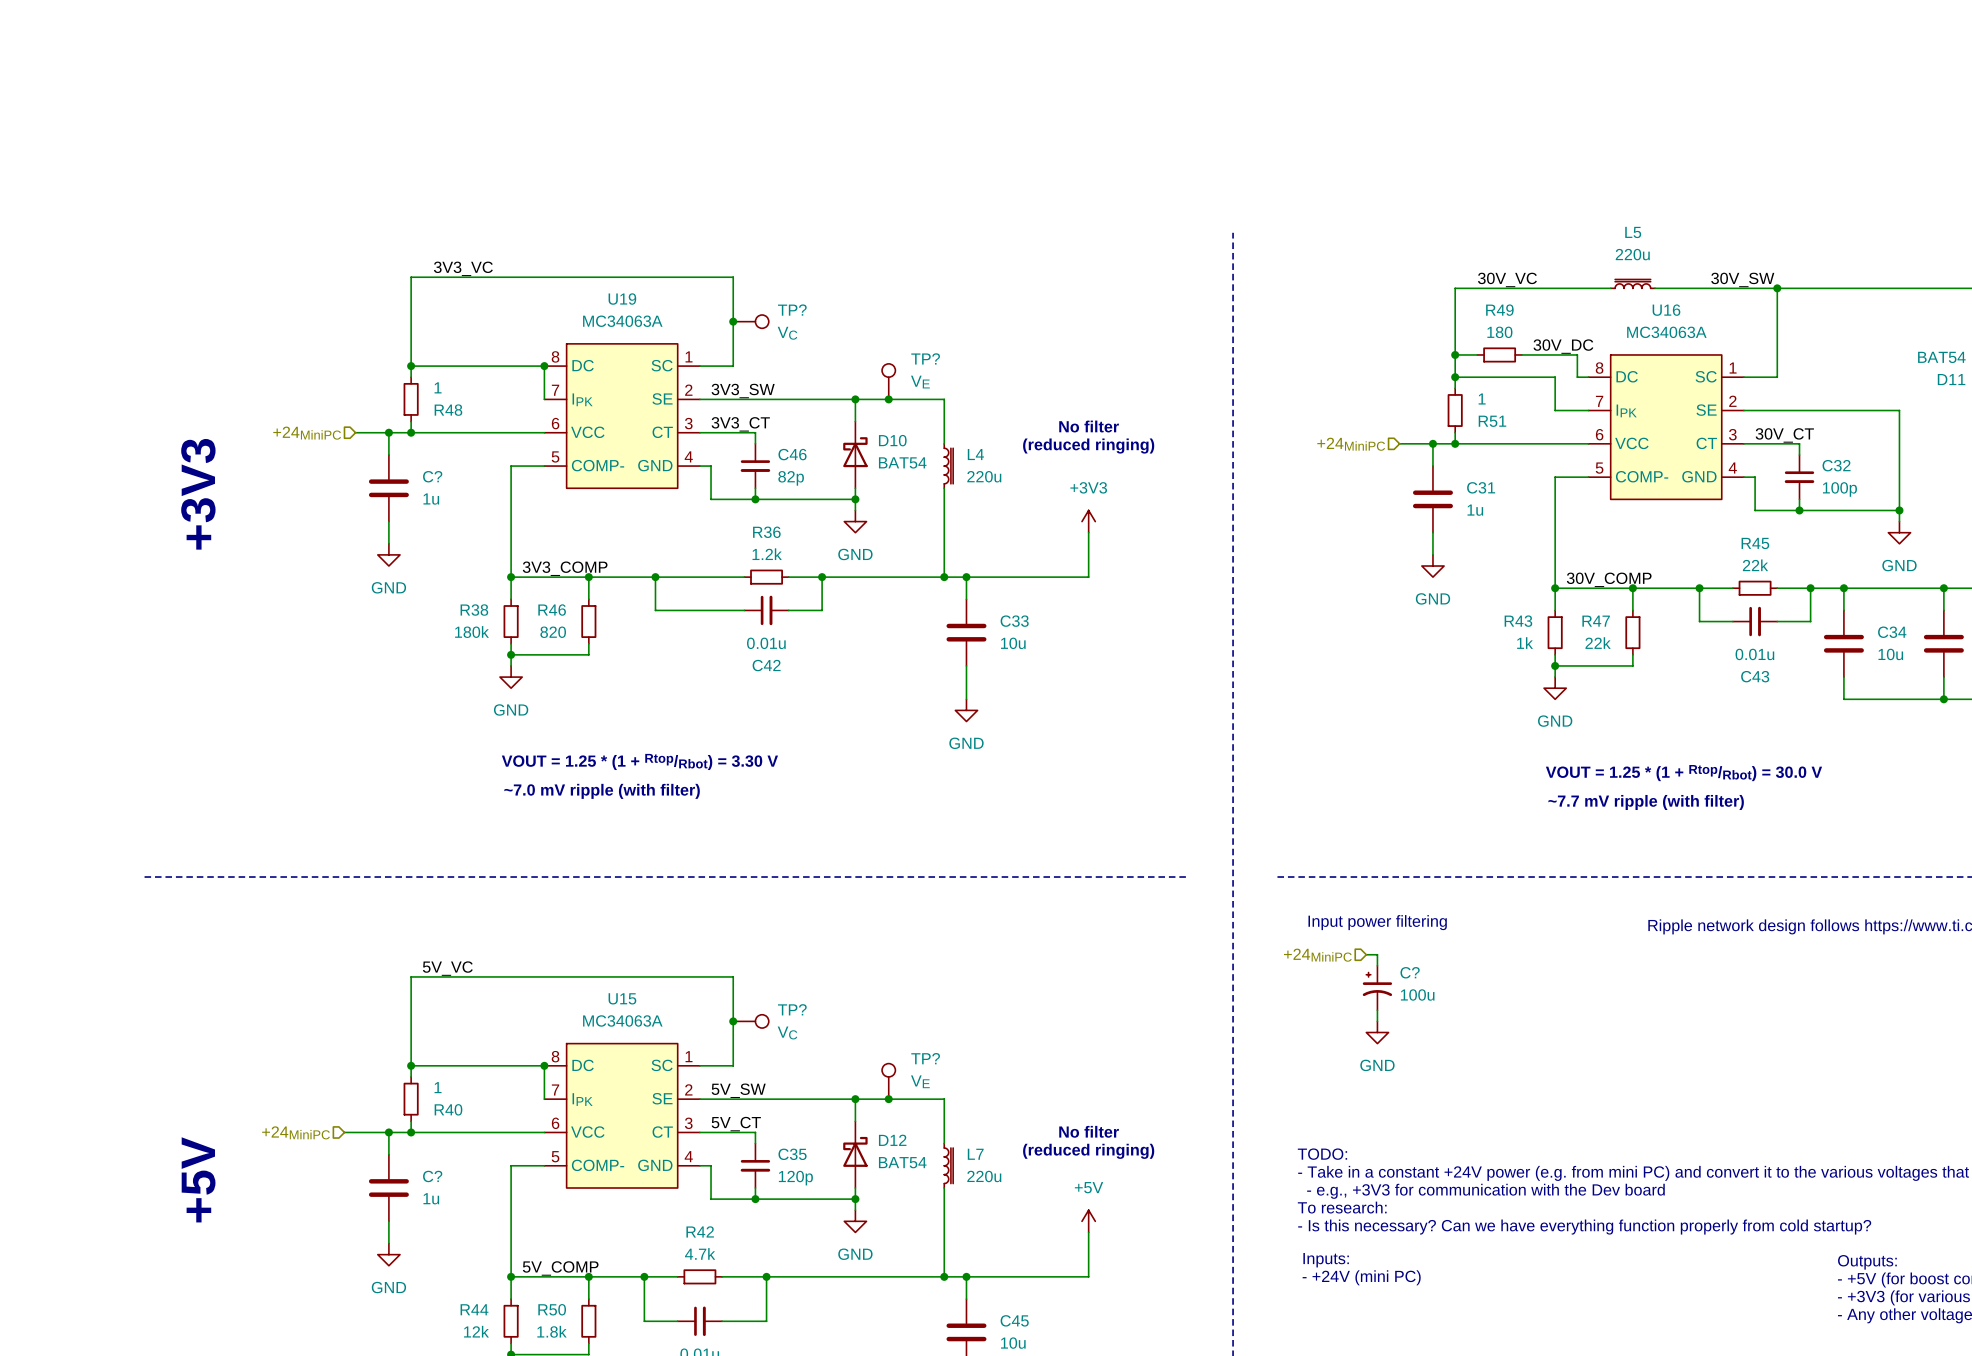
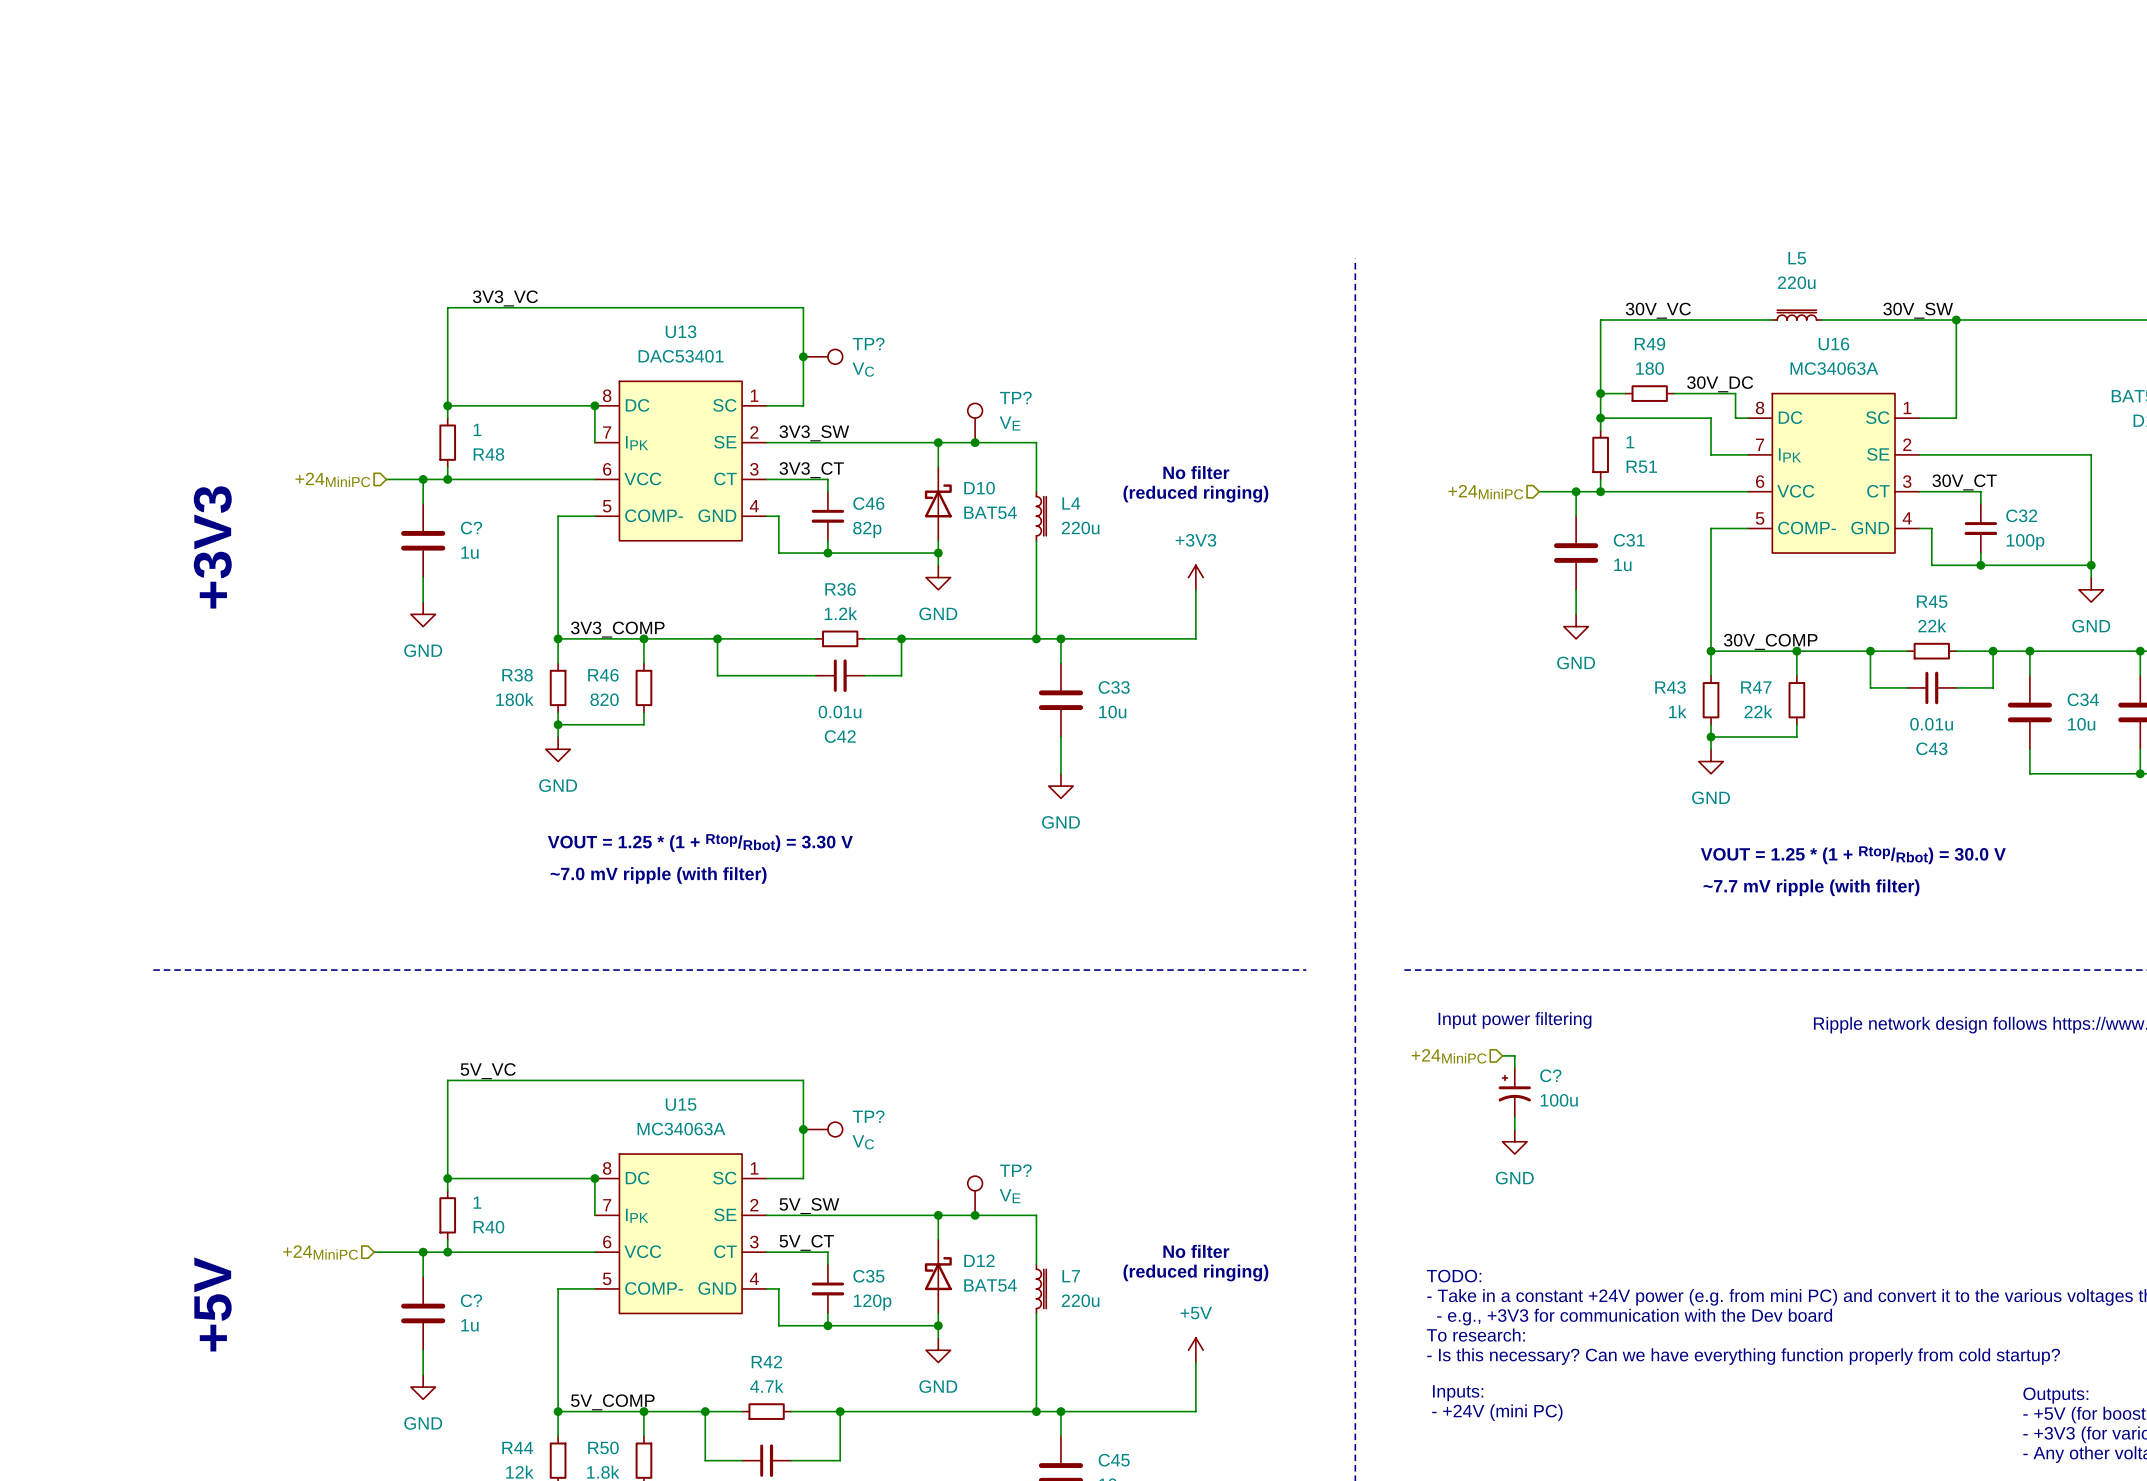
U19 name: U19 (622, 299) -> U13 (681, 331)
U19 value: MC34063A (622, 321) -> DAC53401 (681, 356)

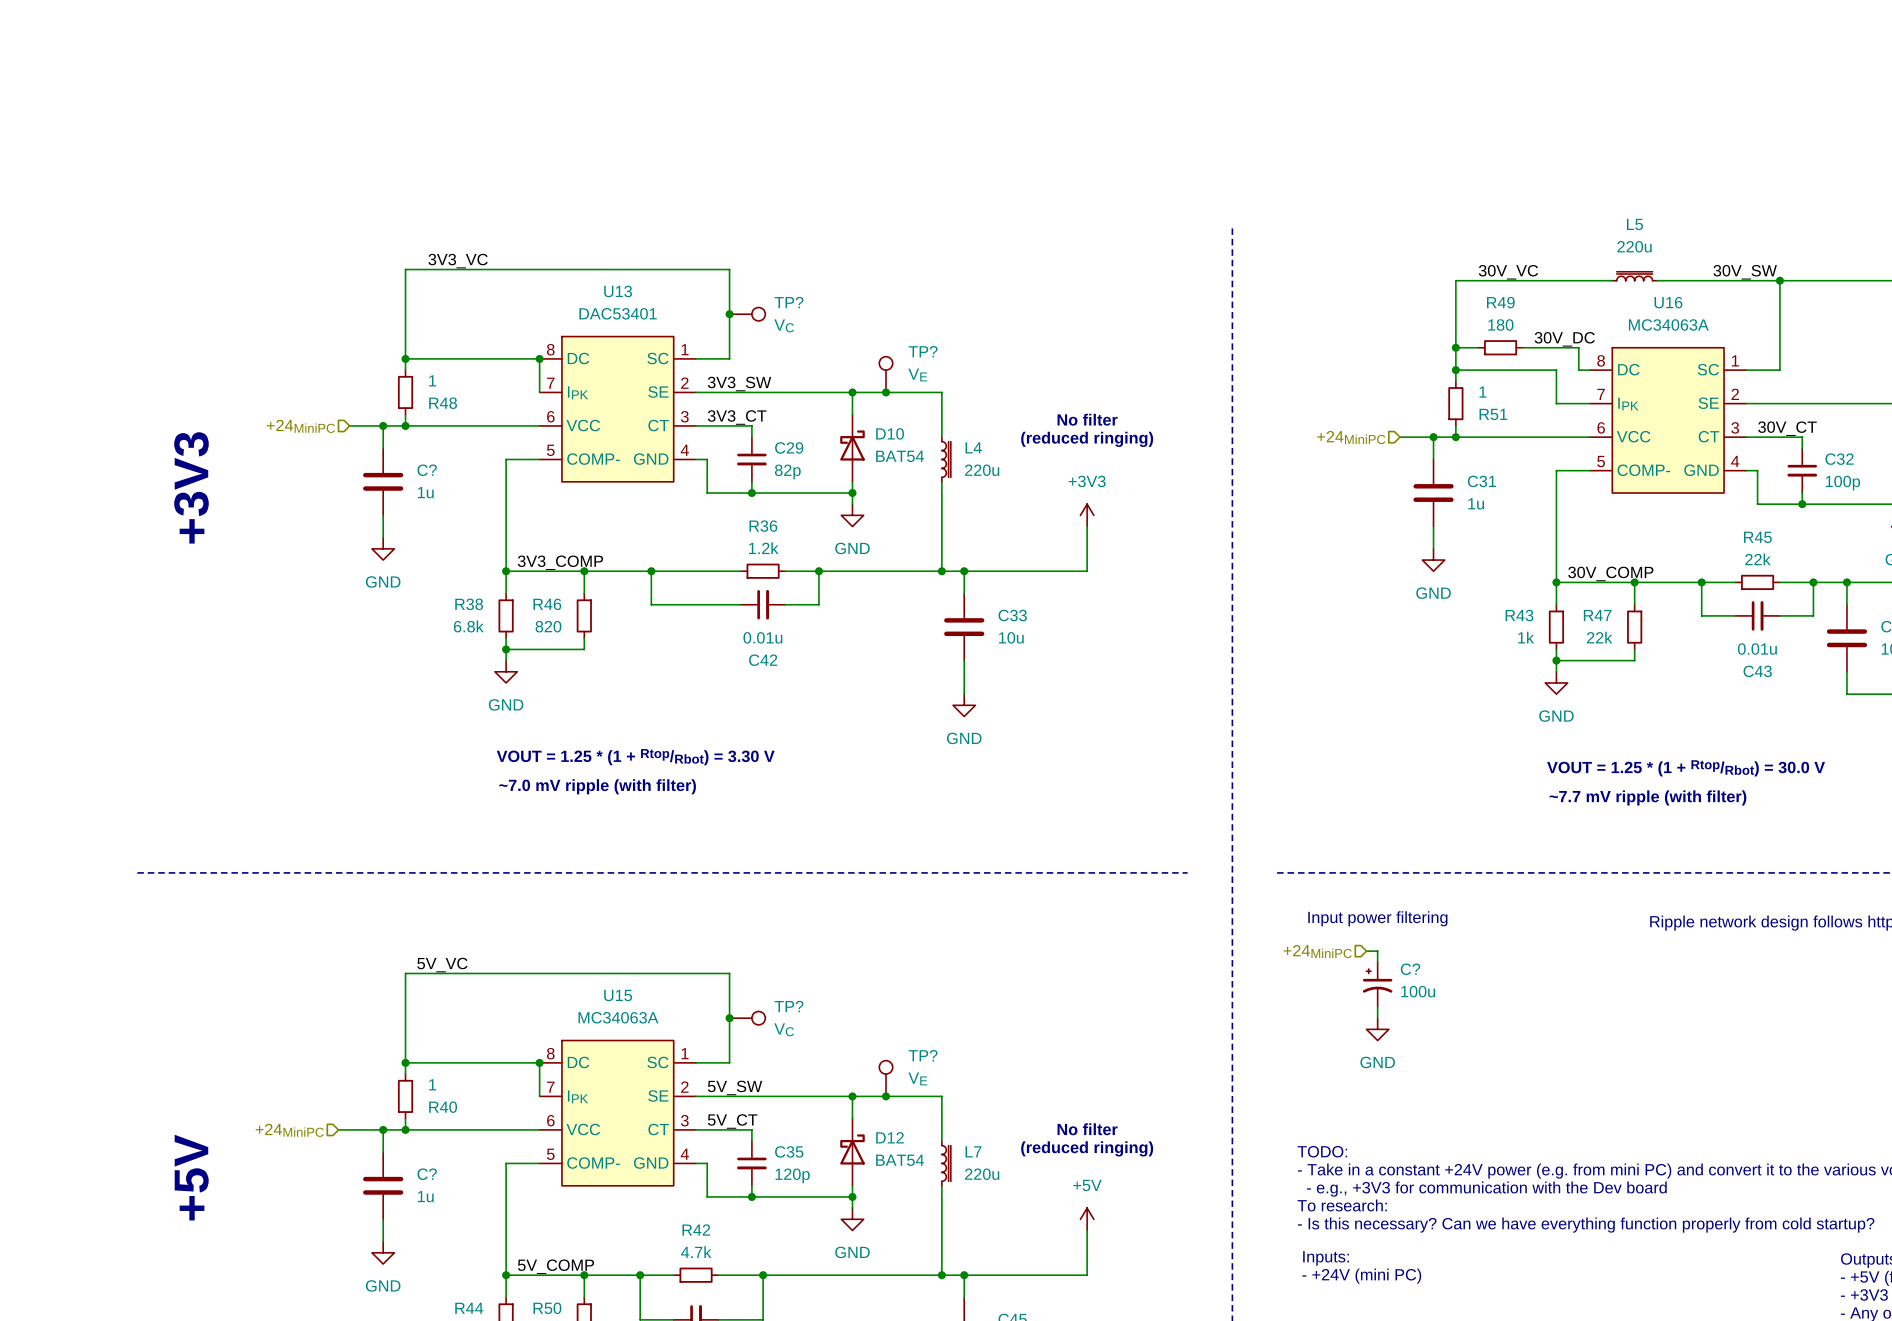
C46 name: C46 (868, 503) -> C29 (789, 447)
R38 value: 180k (514, 699) -> 6.8k (468, 626)

